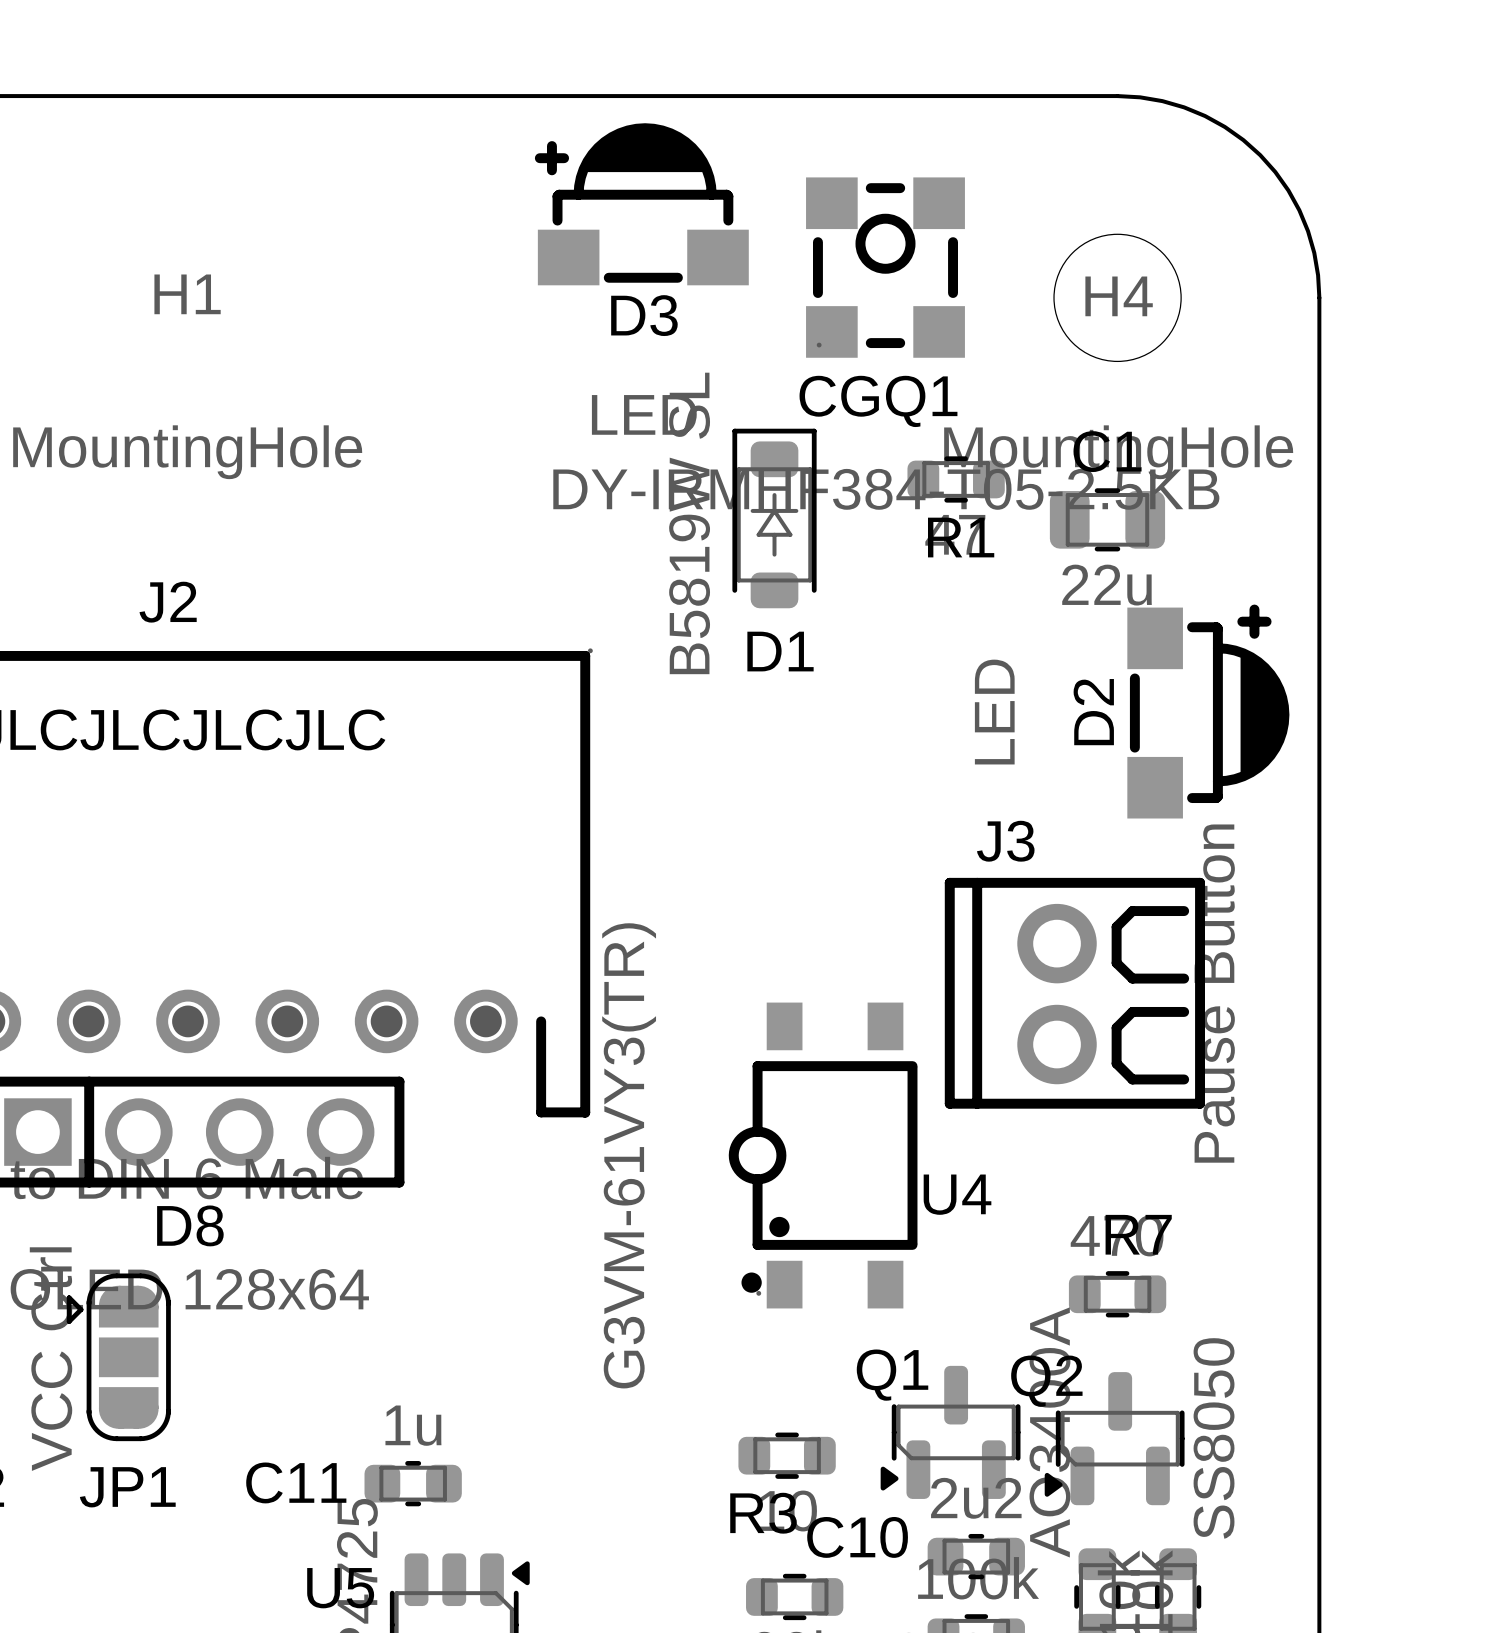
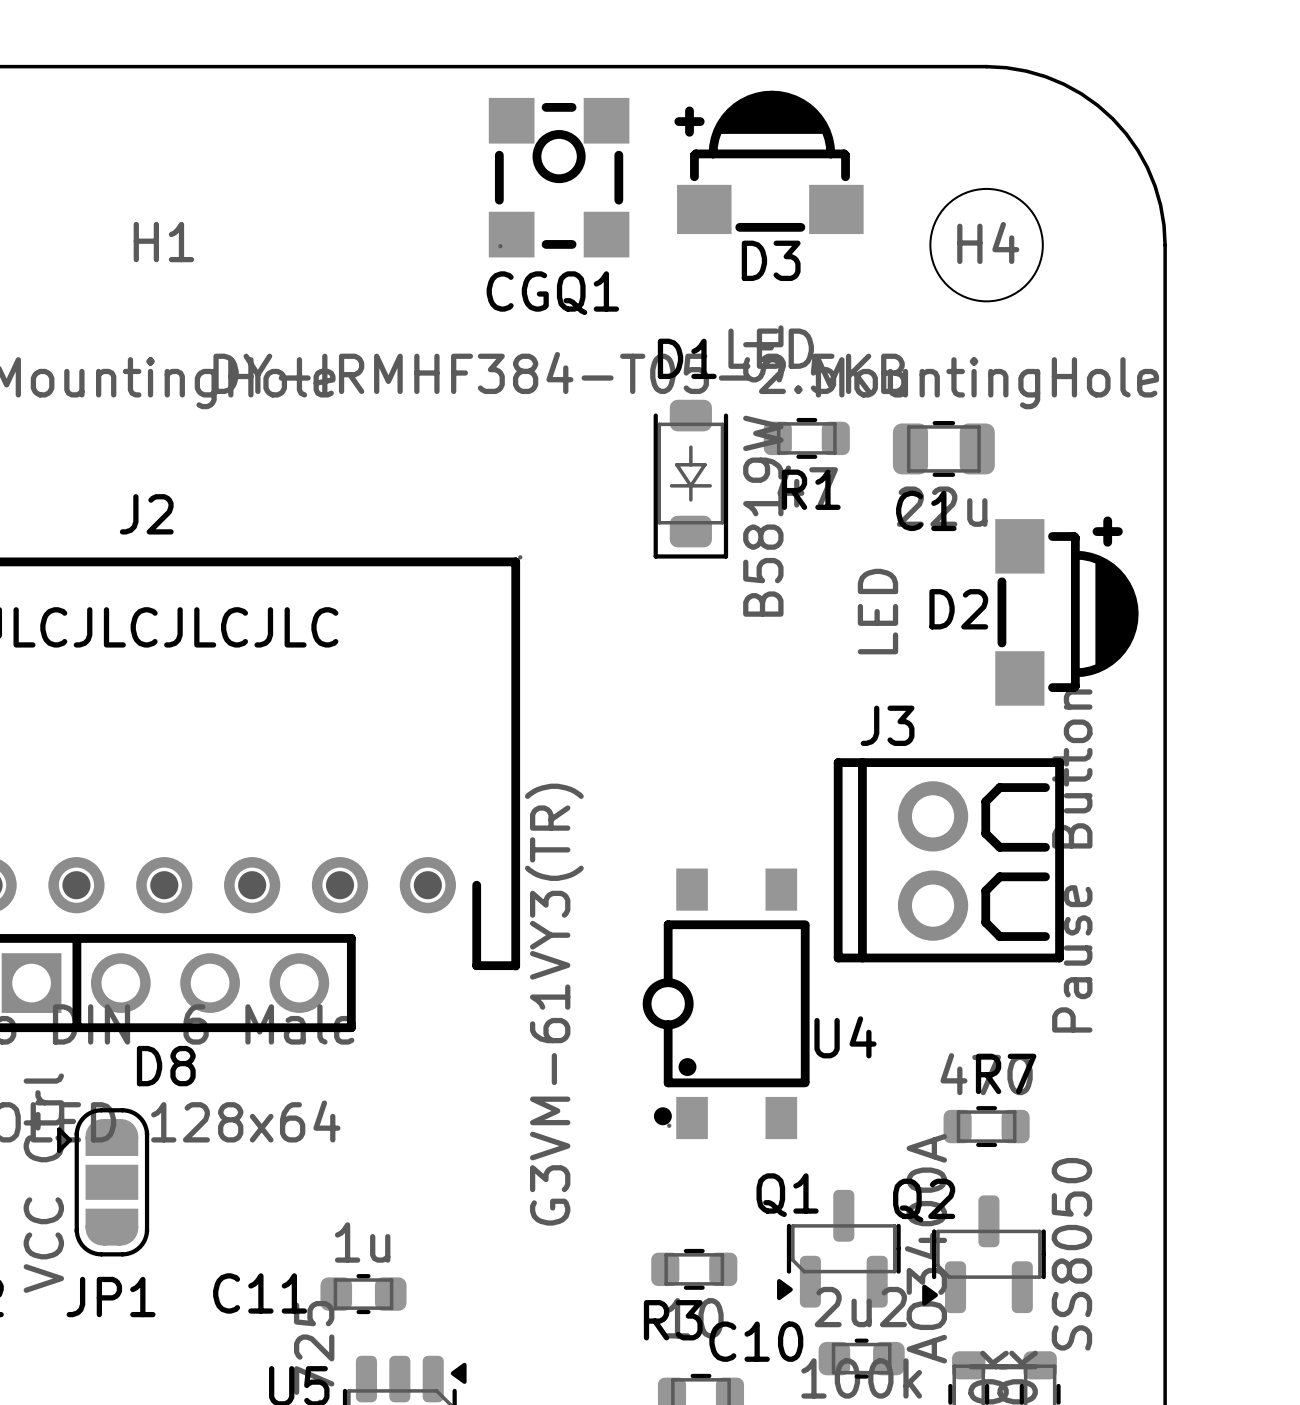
D3 position: (641, 204) -> (769, 162)
CGQ1 position: (873, 267) -> (548, 177)
C1 name position: C1 (1107, 451) -> C1 (926, 510)
R1 position: (956, 479) -> (806, 438)
D1 rotation: 0° (774, 518) -> 180° (690, 479)
C1 position: (1107, 519) -> (943, 448)
D2 name rotation: 0° (1093, 712) -> 90° clockwise (958, 609)

